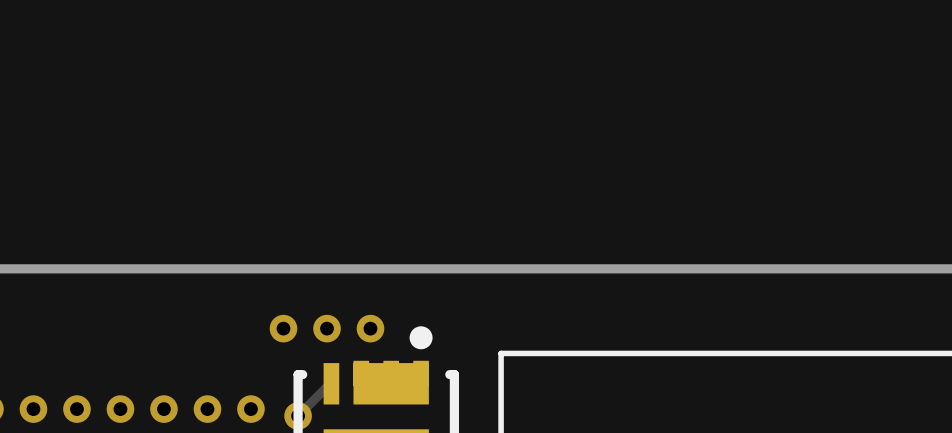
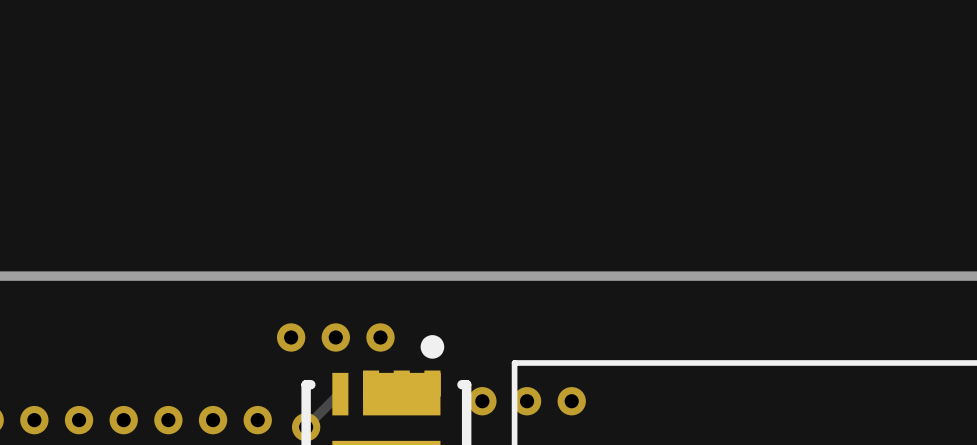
via: none -> (482, 401)
via: none -> (527, 401)
via: none -> (571, 401)

